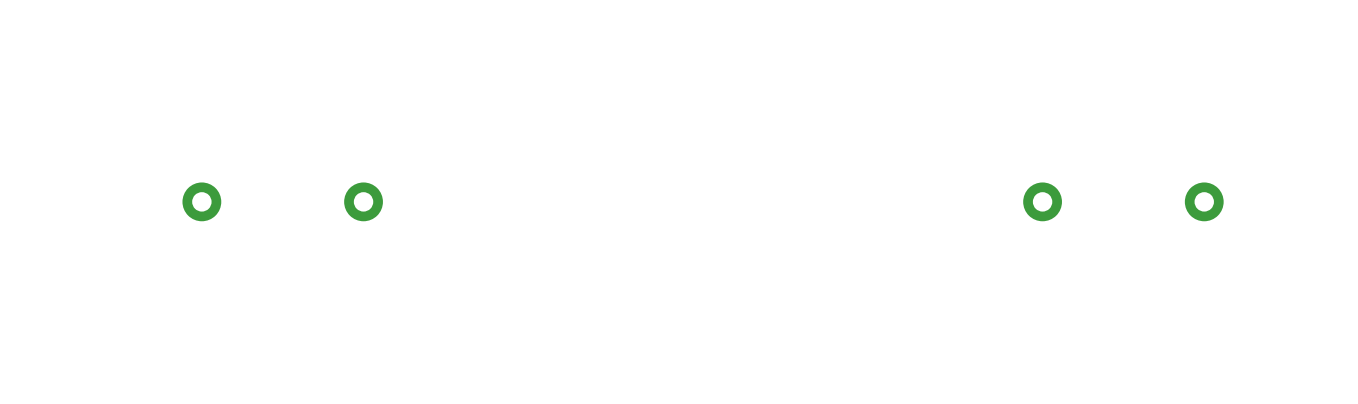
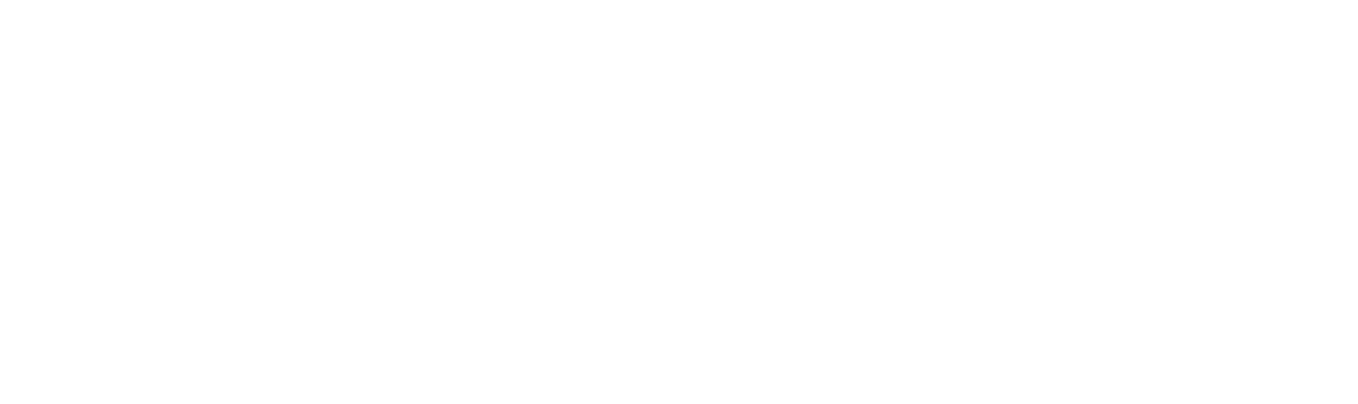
via: (201, 201) -> none
via: (363, 201) -> none
via: (1042, 201) -> none
via: (1204, 201) -> none

